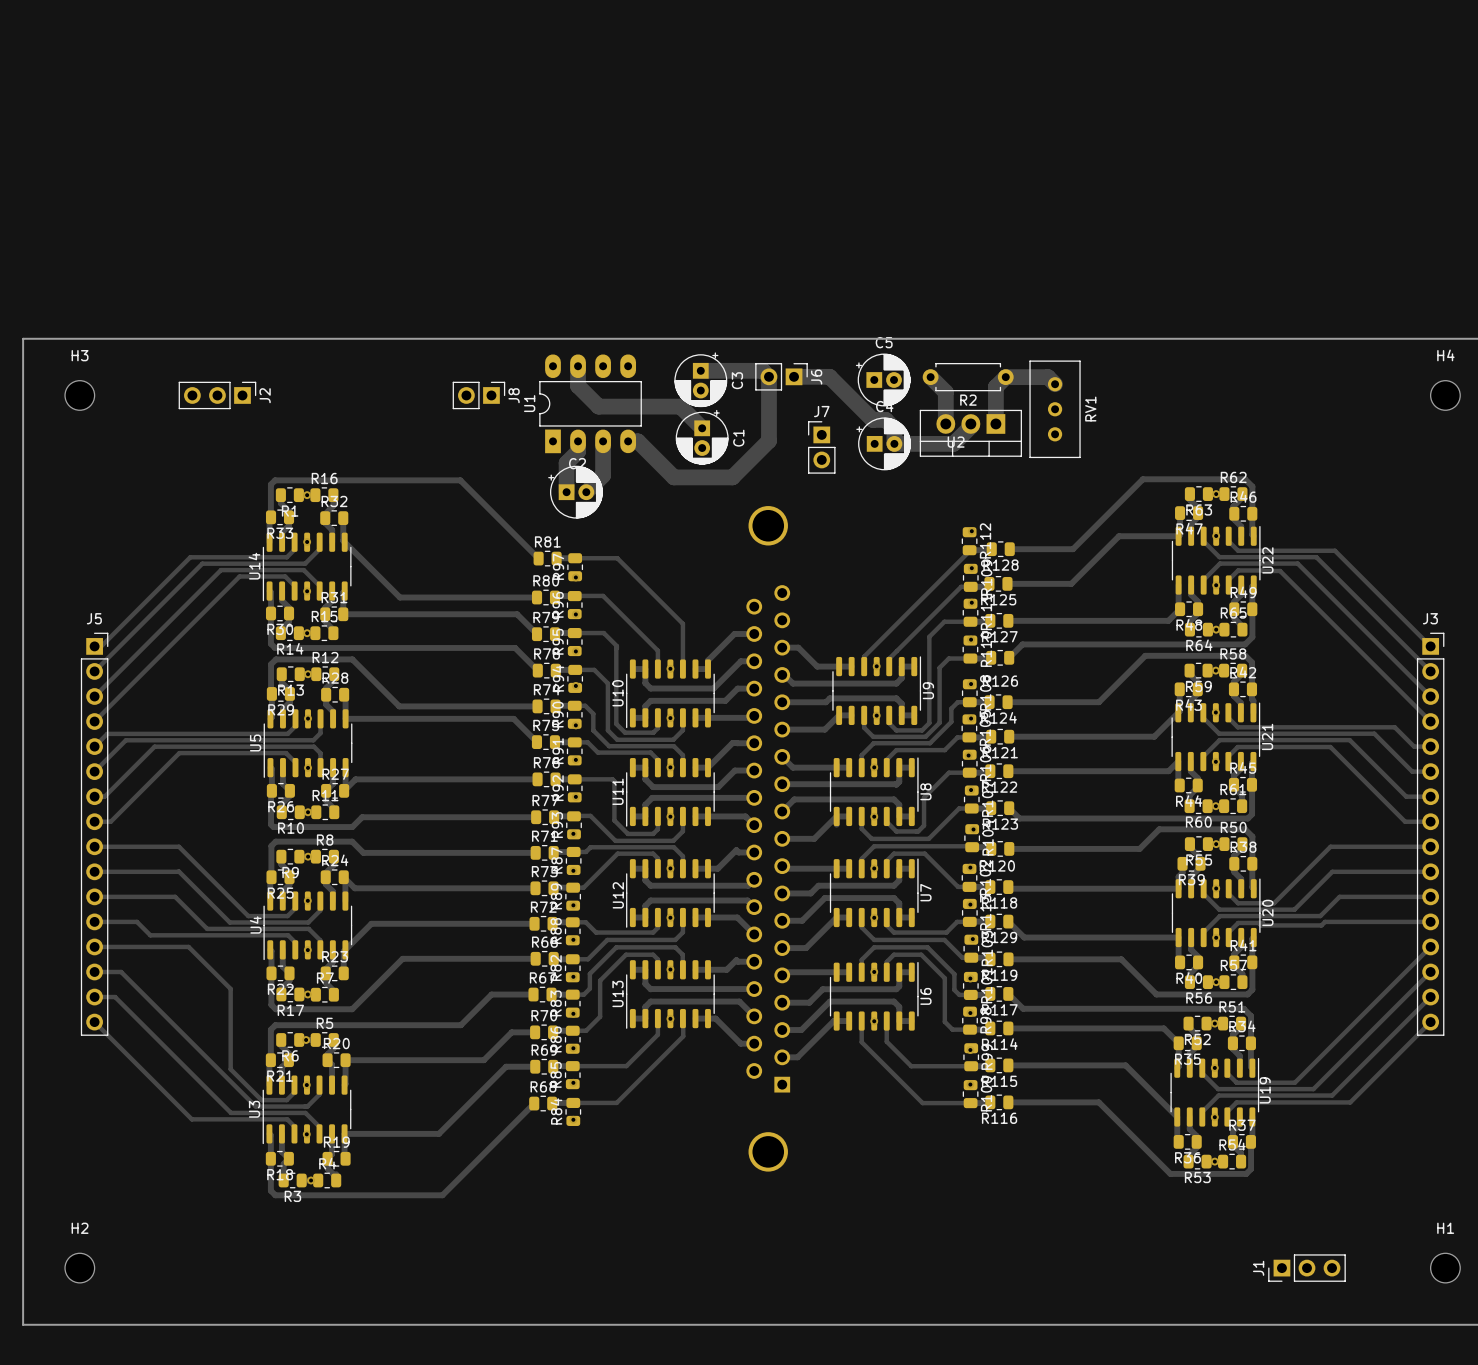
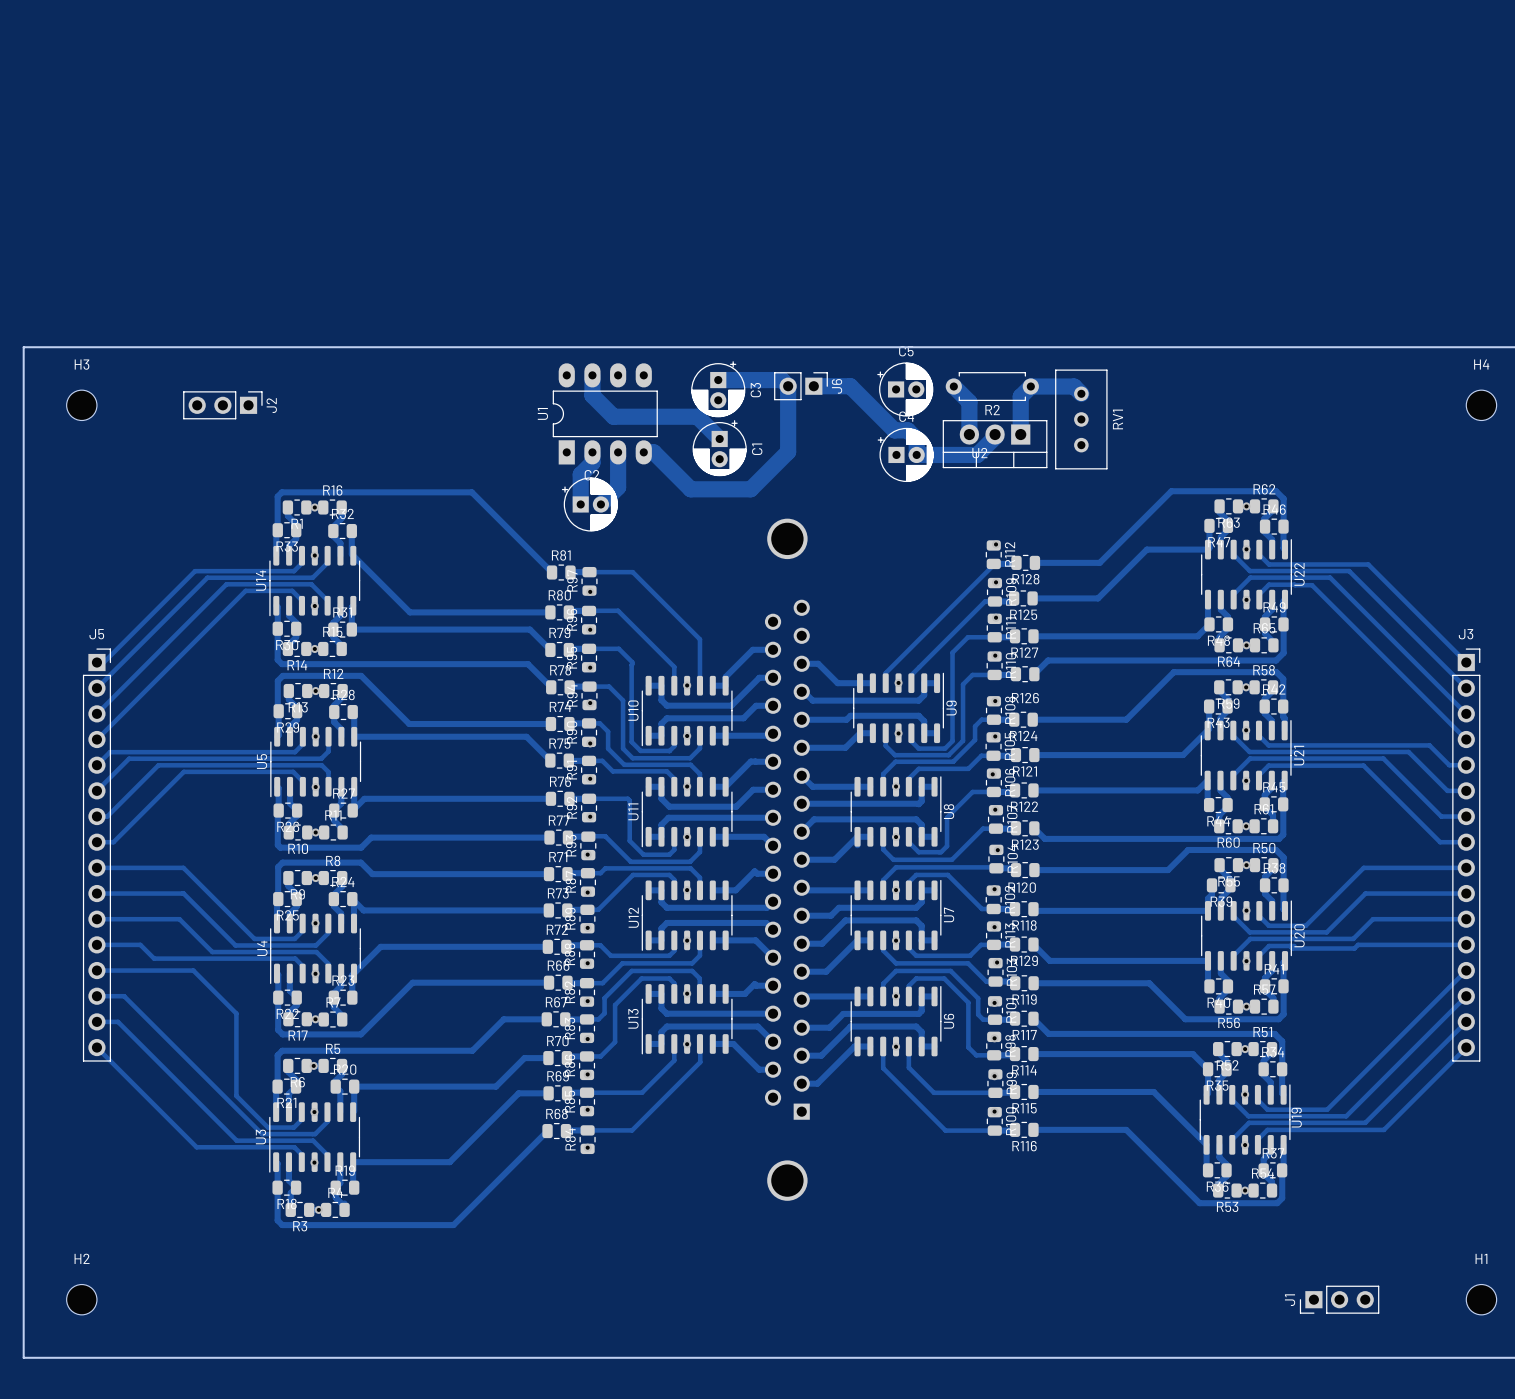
J8: (478, 395) -> none
J7: (821, 447) -> none

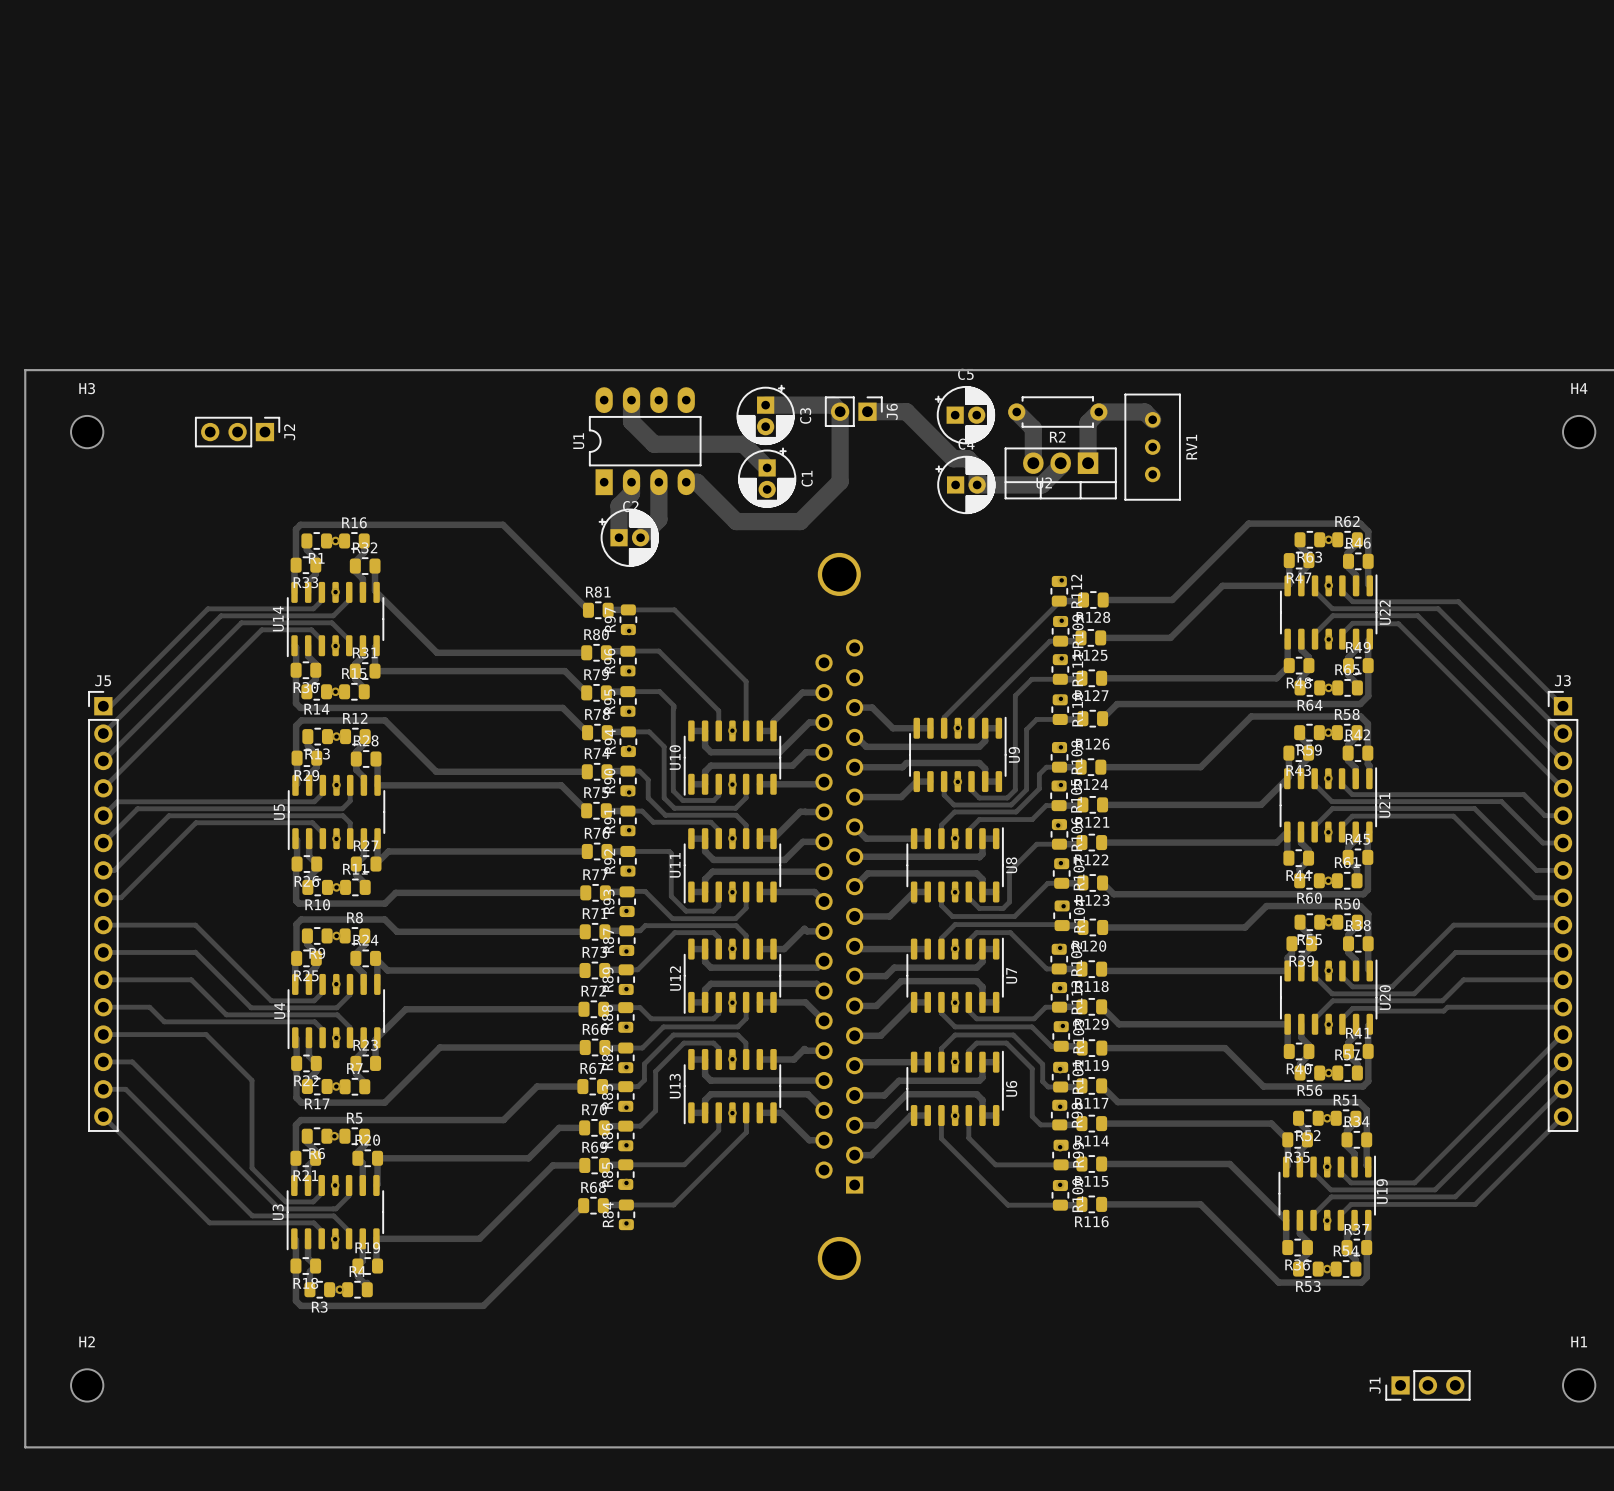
J5 footprint: [82, 648, 112, 1062] -> [88, 691, 119, 1132]
J3 footprint: [1452, 648, 1481, 1062] -> [1548, 691, 1578, 1132]

